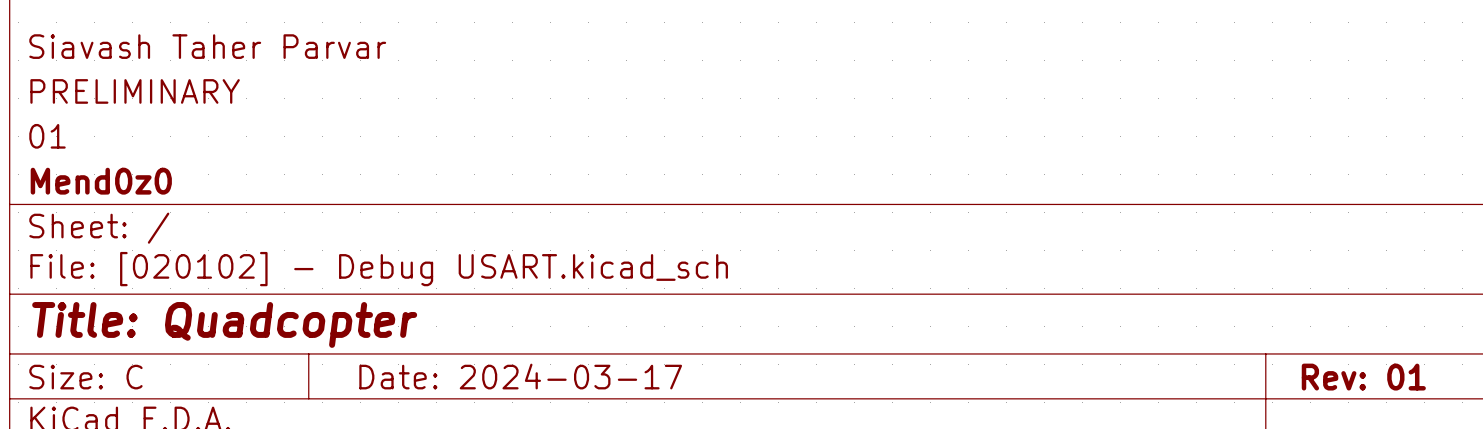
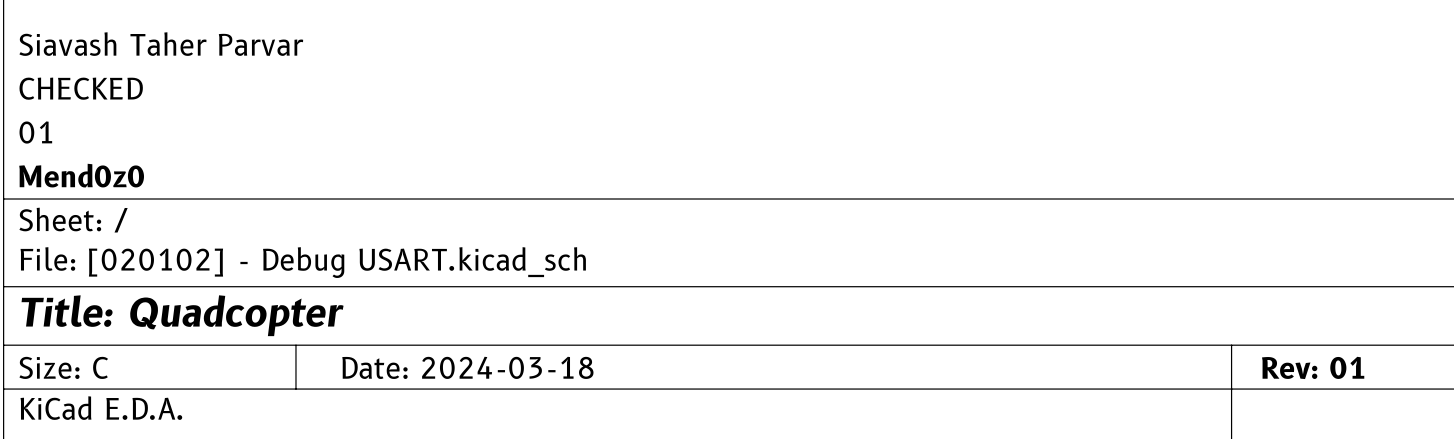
title block: PRELIMINARY (135, 91) -> CHECKED (81, 88)
title block: Date: 2024-03-17 (520, 376) -> Date: 2024-03-18 (467, 367)

